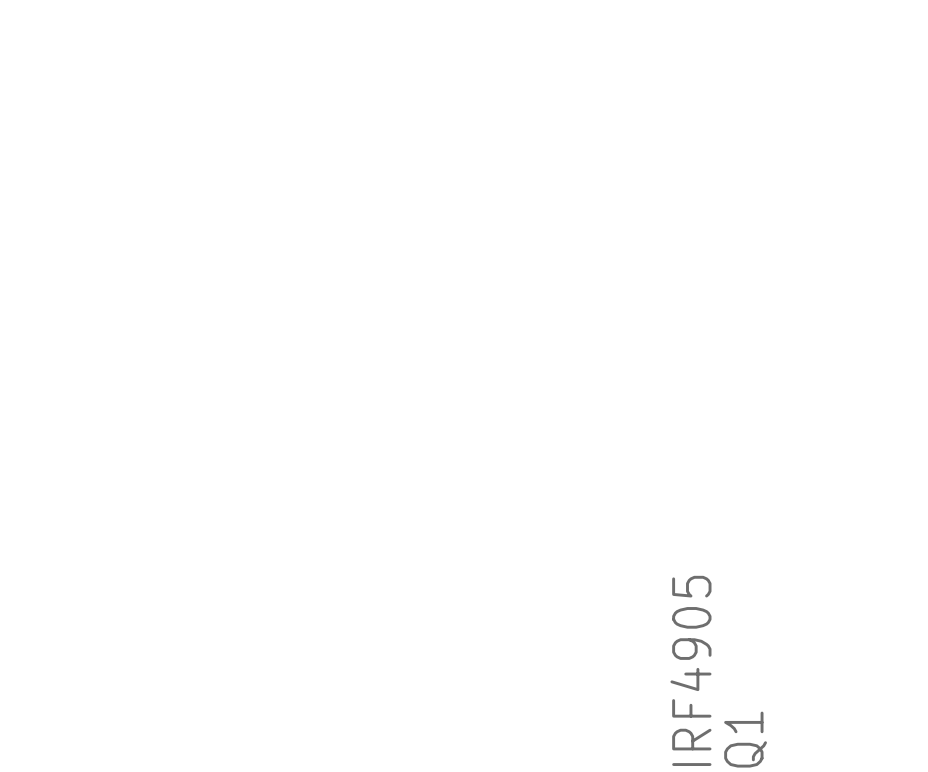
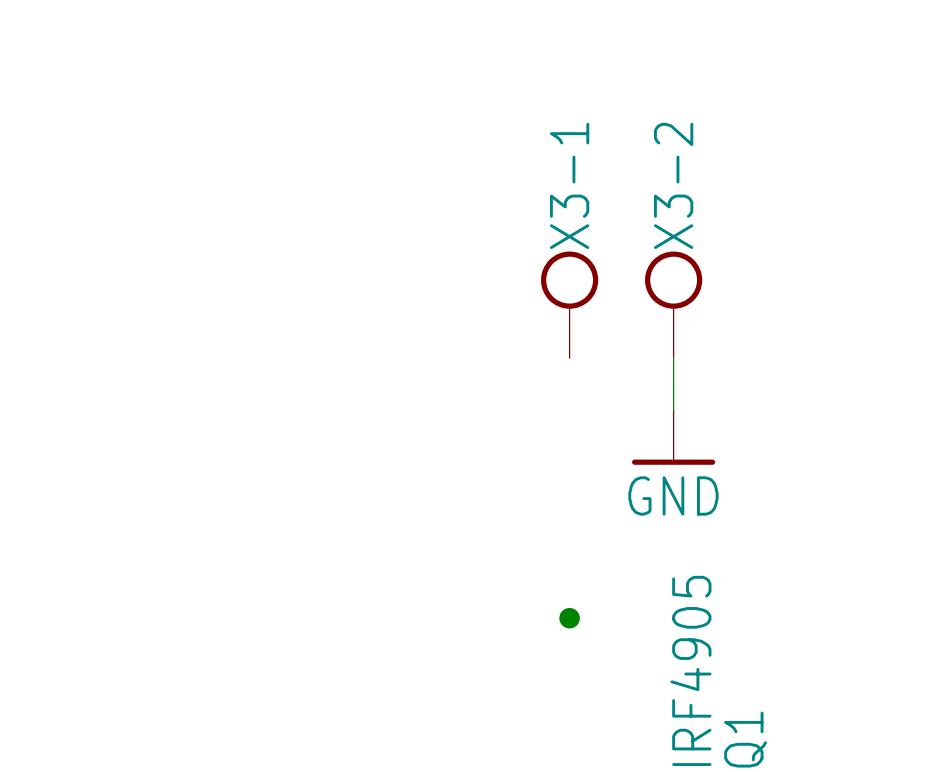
X3-1: none -> (569, 304)
X3-2: none -> (673, 304)
wire: none -> (673, 358) (673, 410)
power symbol: none -> GND (673, 437)
junction: none -> (569, 618)

